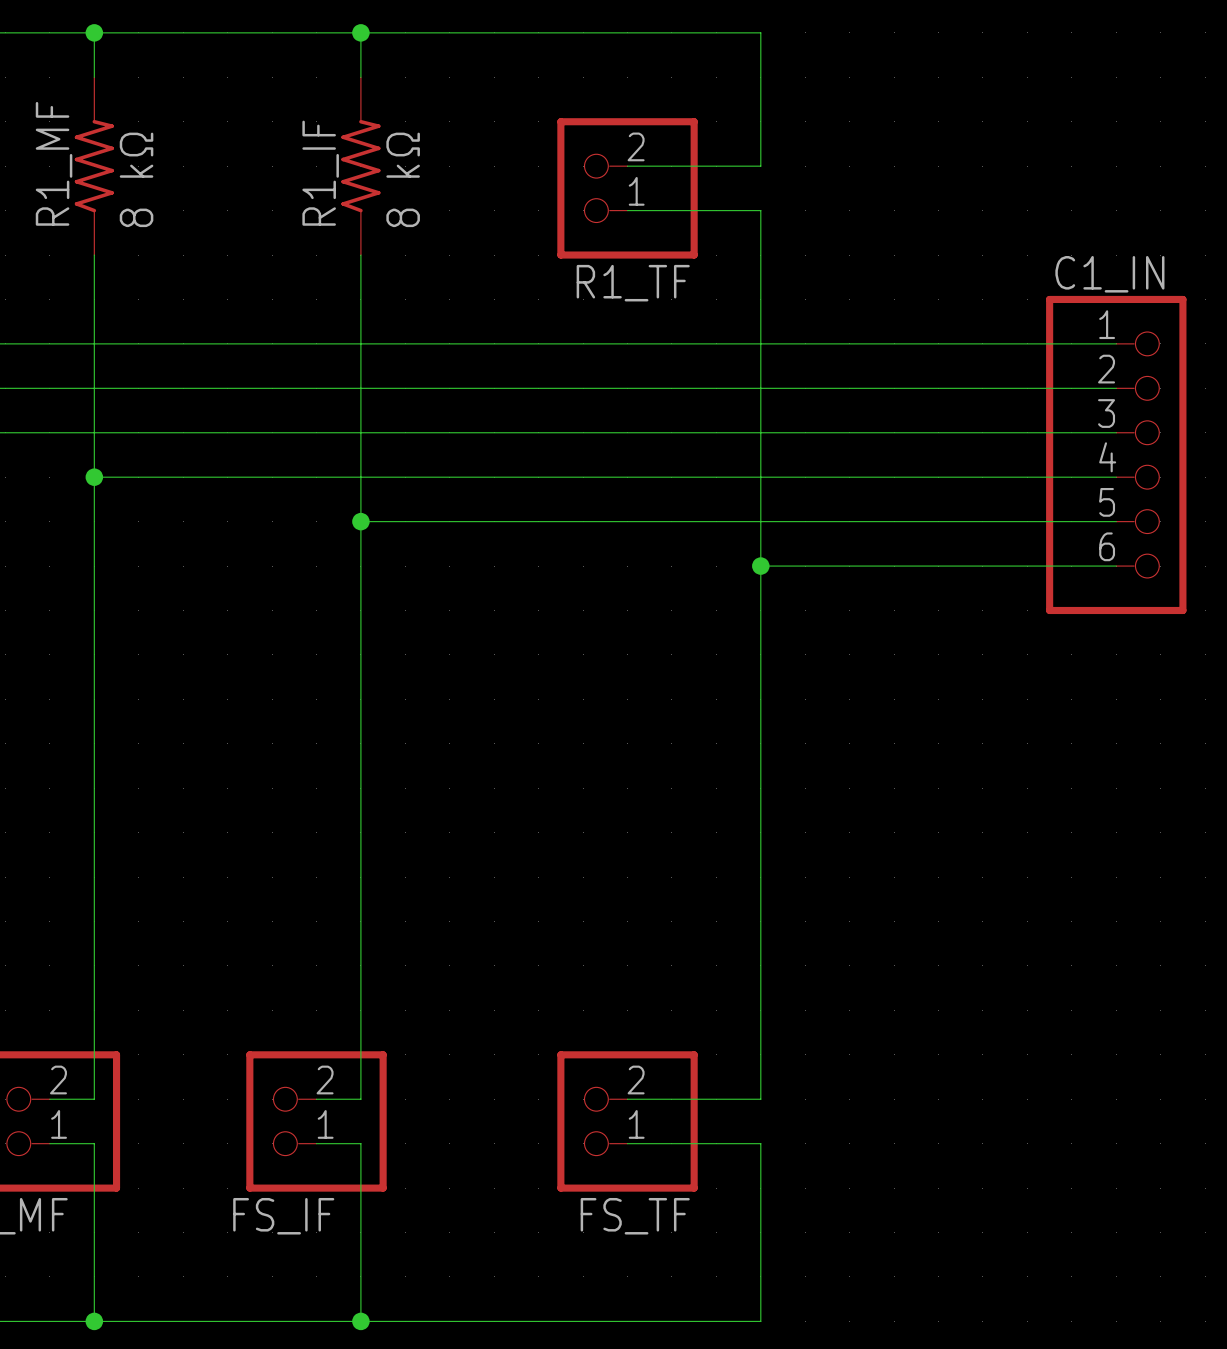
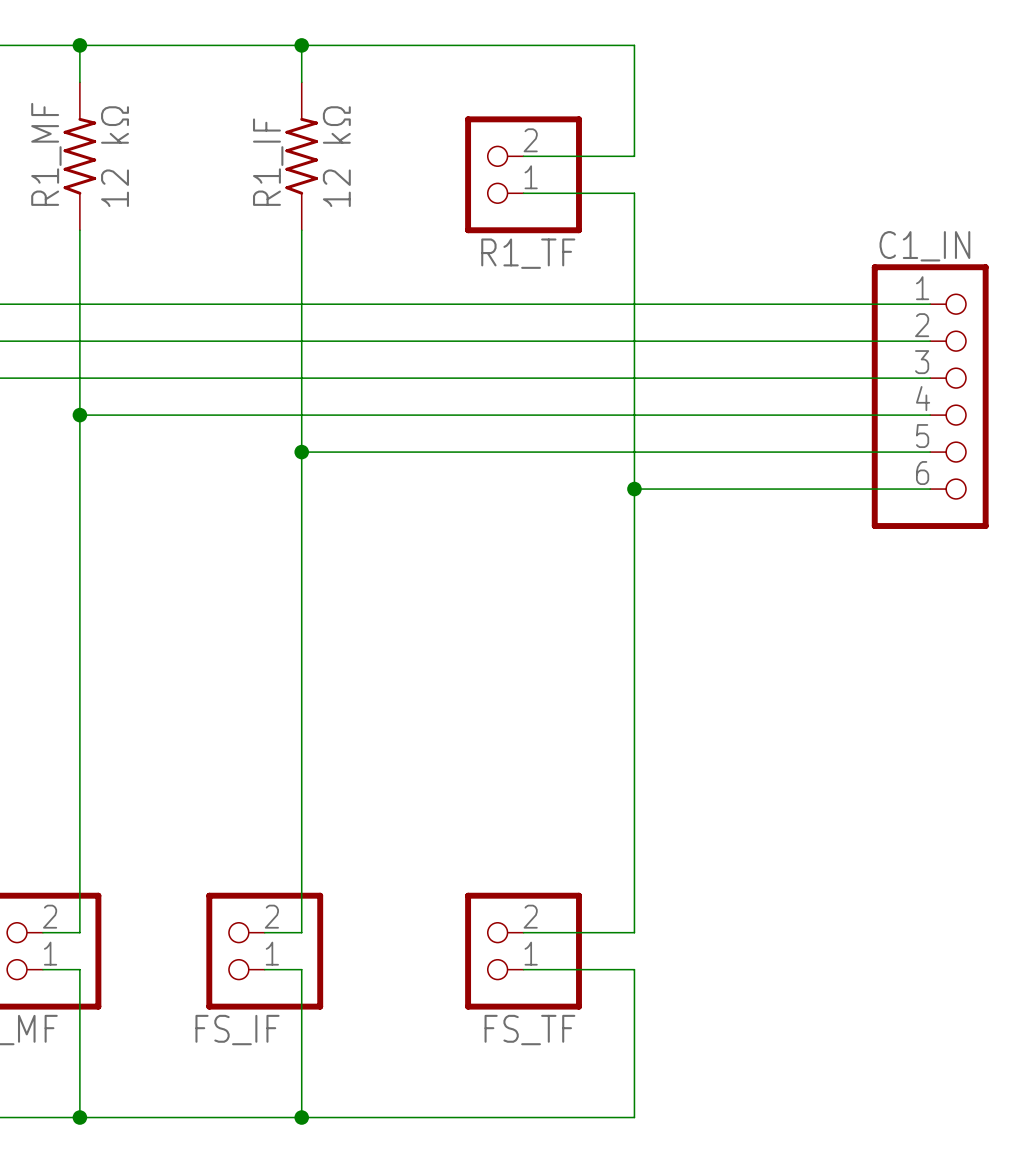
R1_MF value: 8 kΩ (136, 179) -> 12 kΩ (115, 156)
R1_IF value: 8 kΩ (403, 179) -> 12 kΩ (336, 156)

